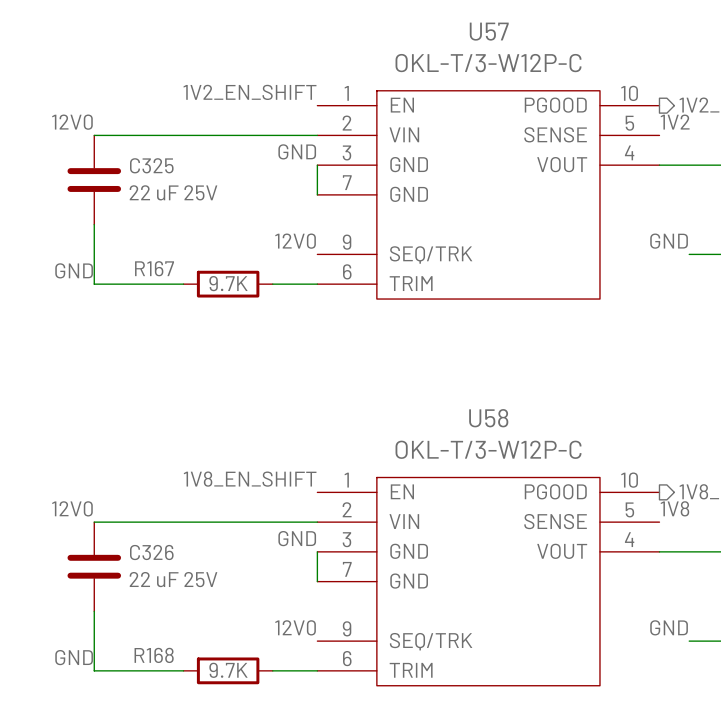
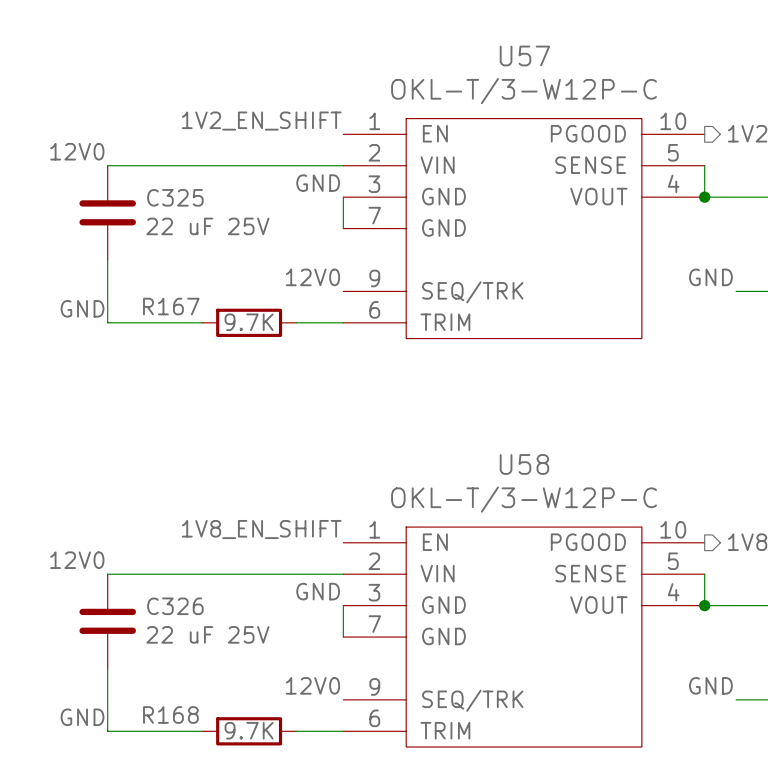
label: 1V2 (675, 122) -> none
wire: none -> (704, 165) (704, 197)
junction: none -> (704, 197)
label: 1V8 (674, 508) -> none
wire: none -> (704, 574) (704, 605)
junction: none -> (704, 605)

